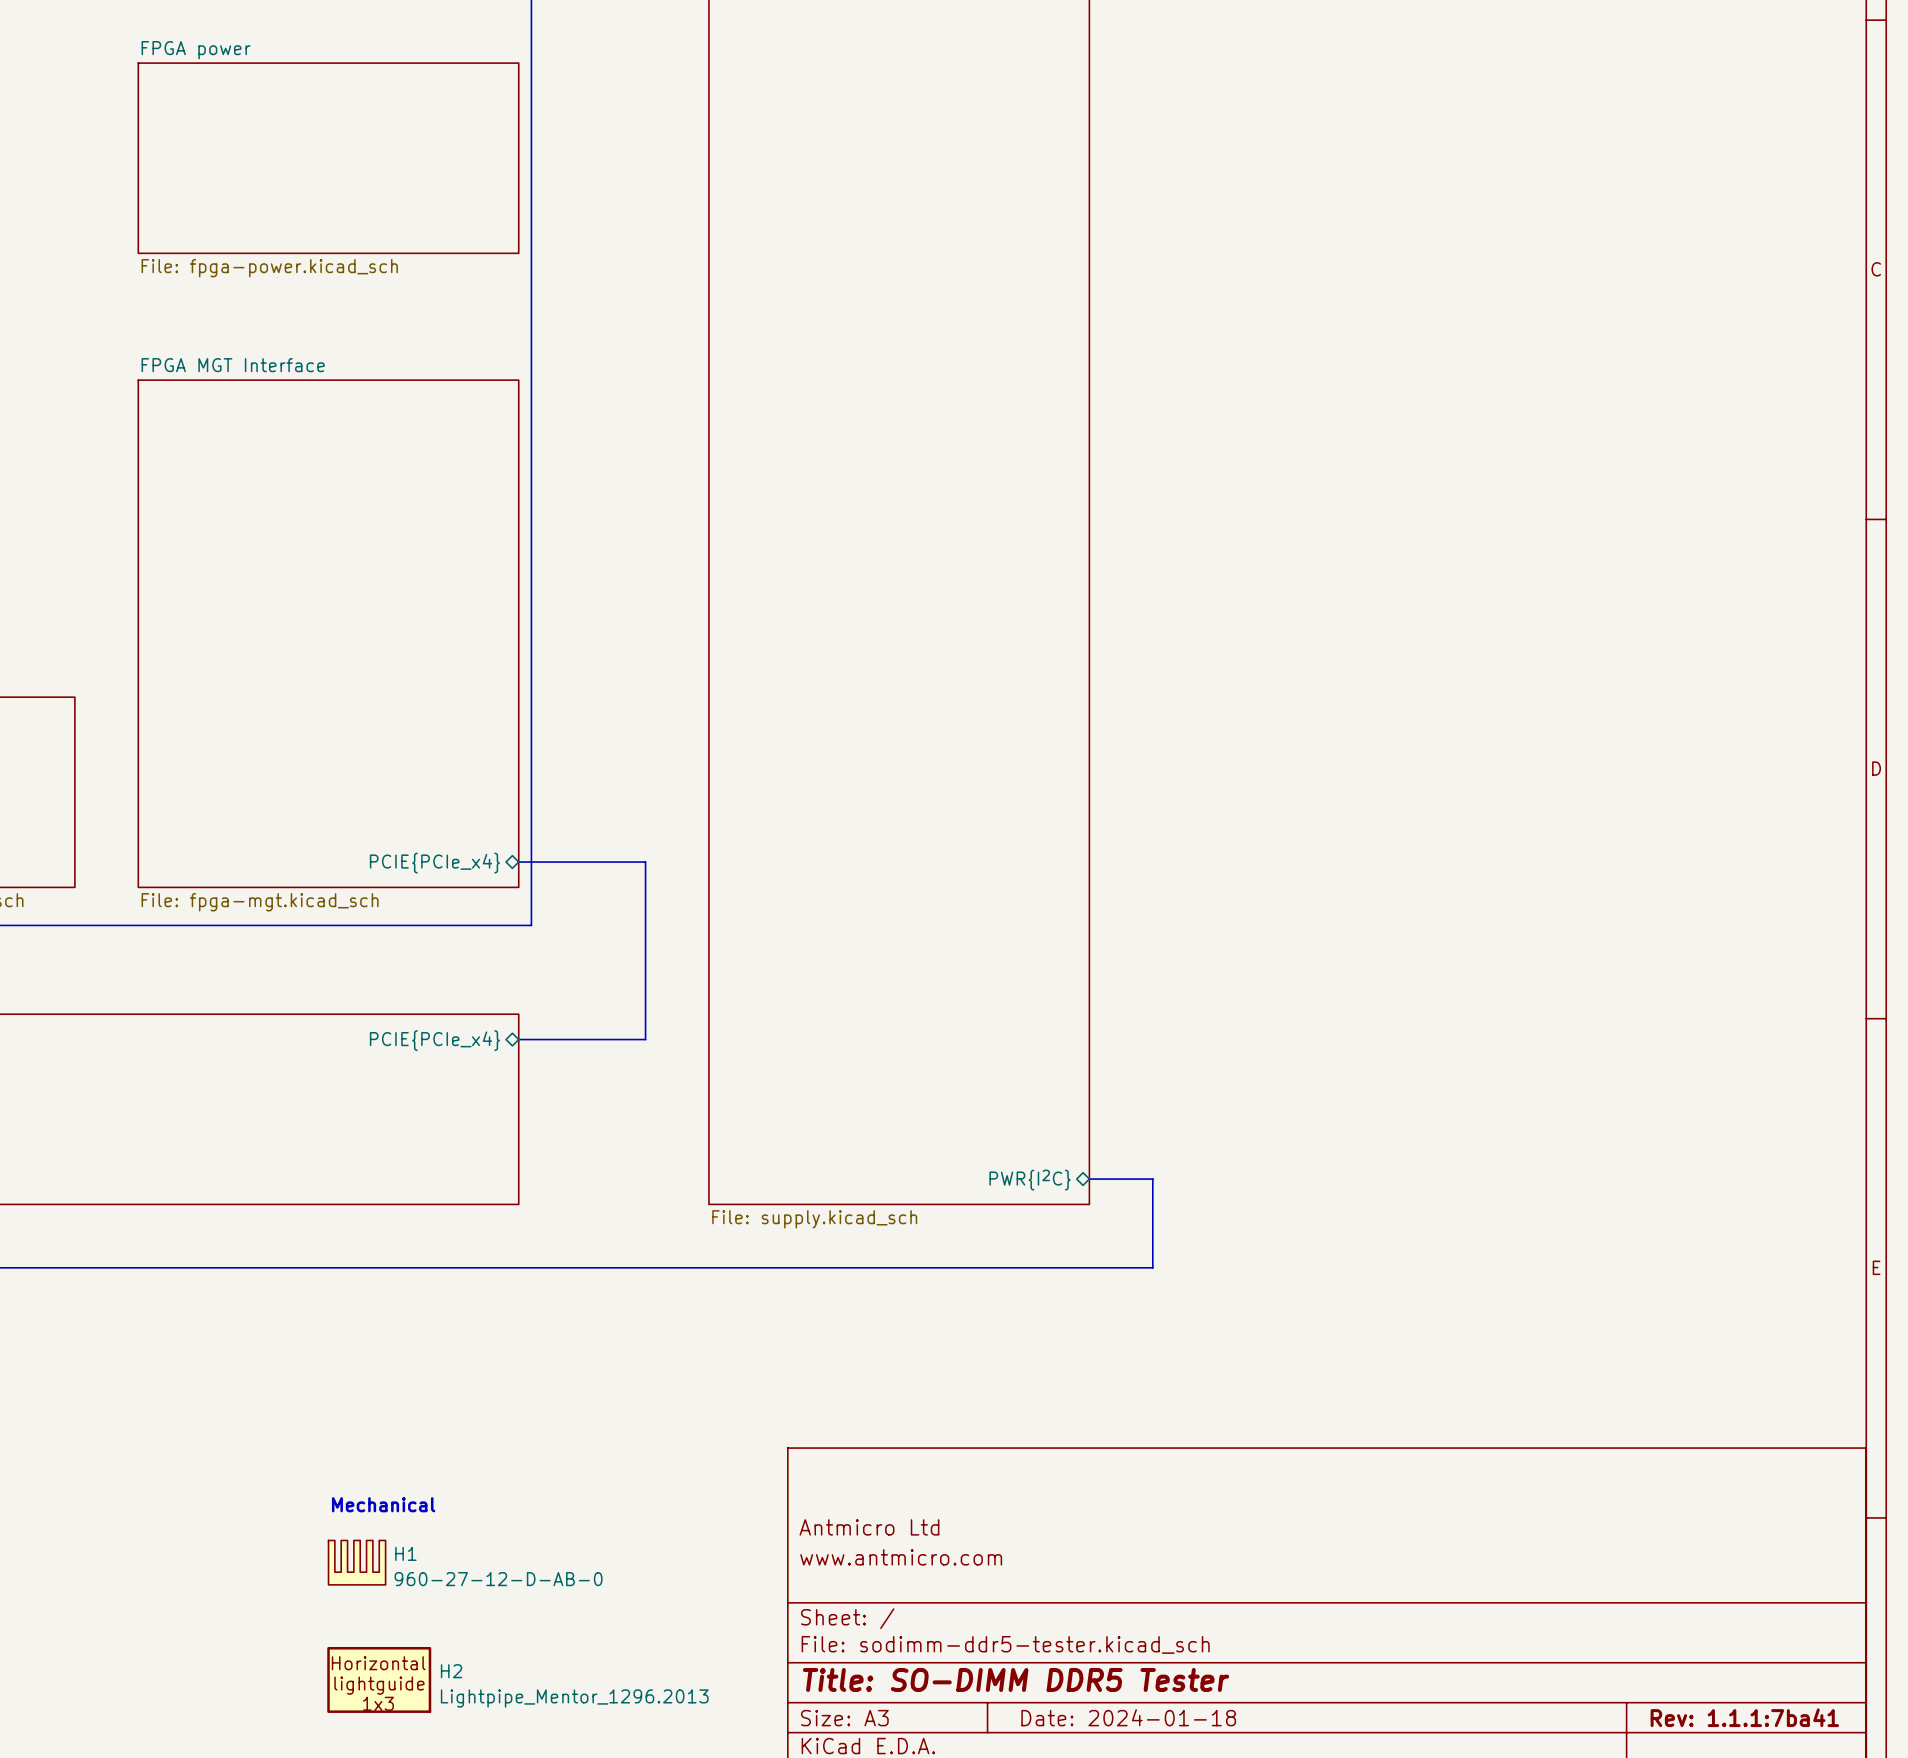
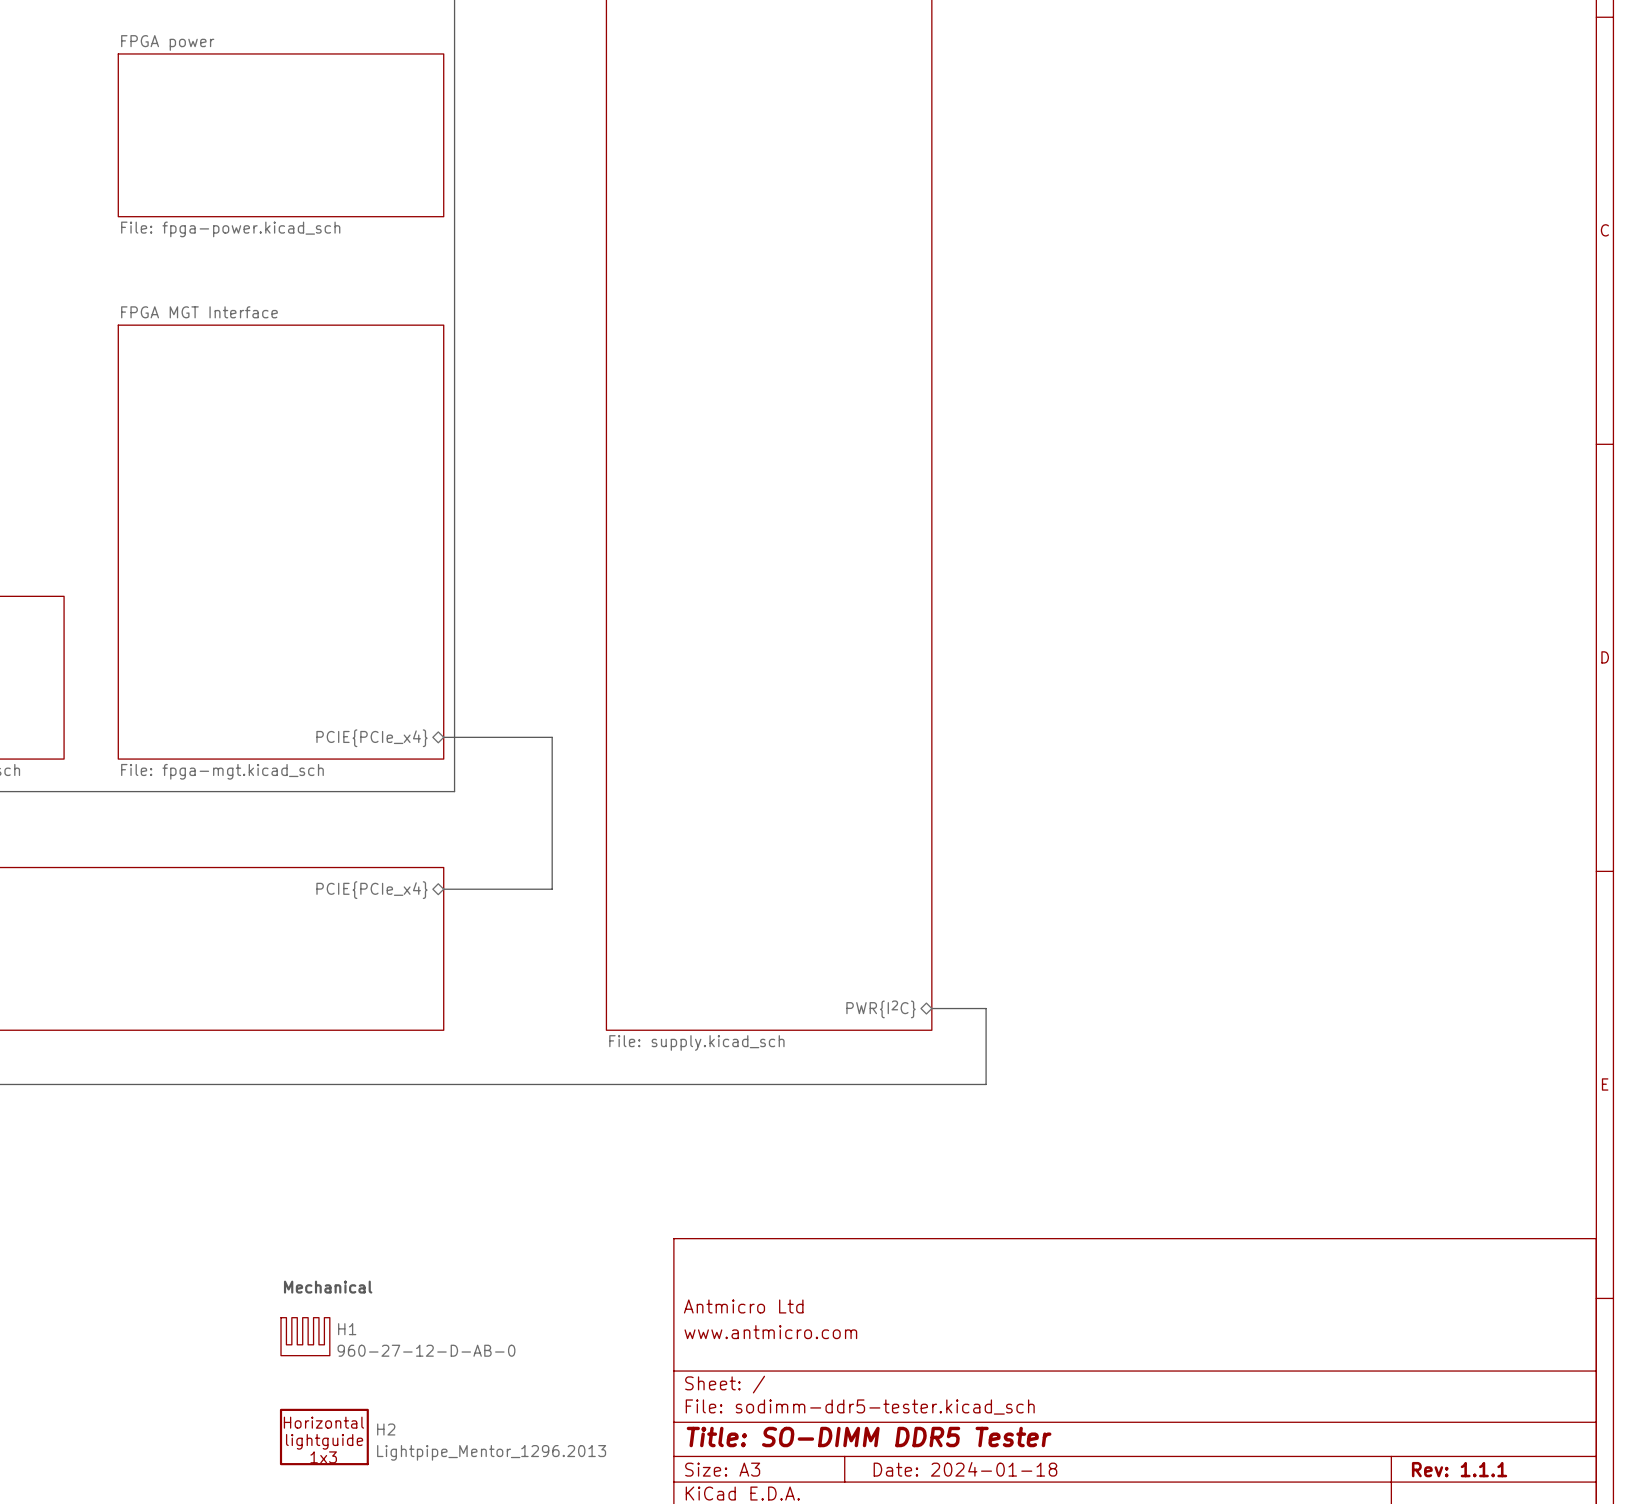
title block: Rev: 1.1.1:7ba41 (1744, 1717) -> Rev: 1.1.1 (1459, 1469)

